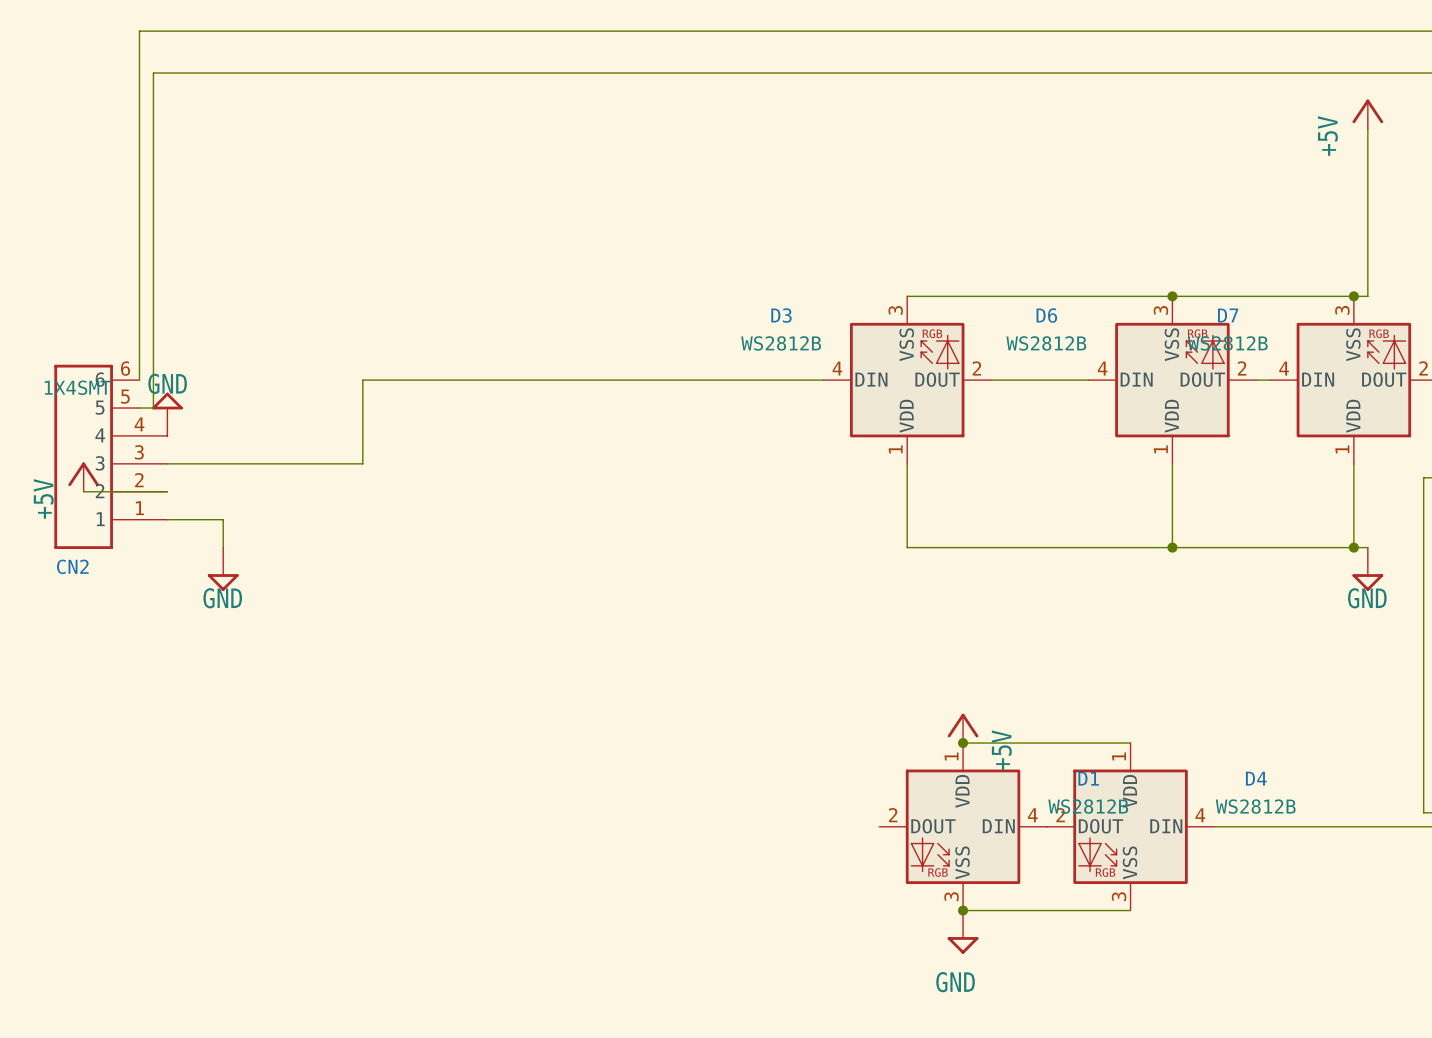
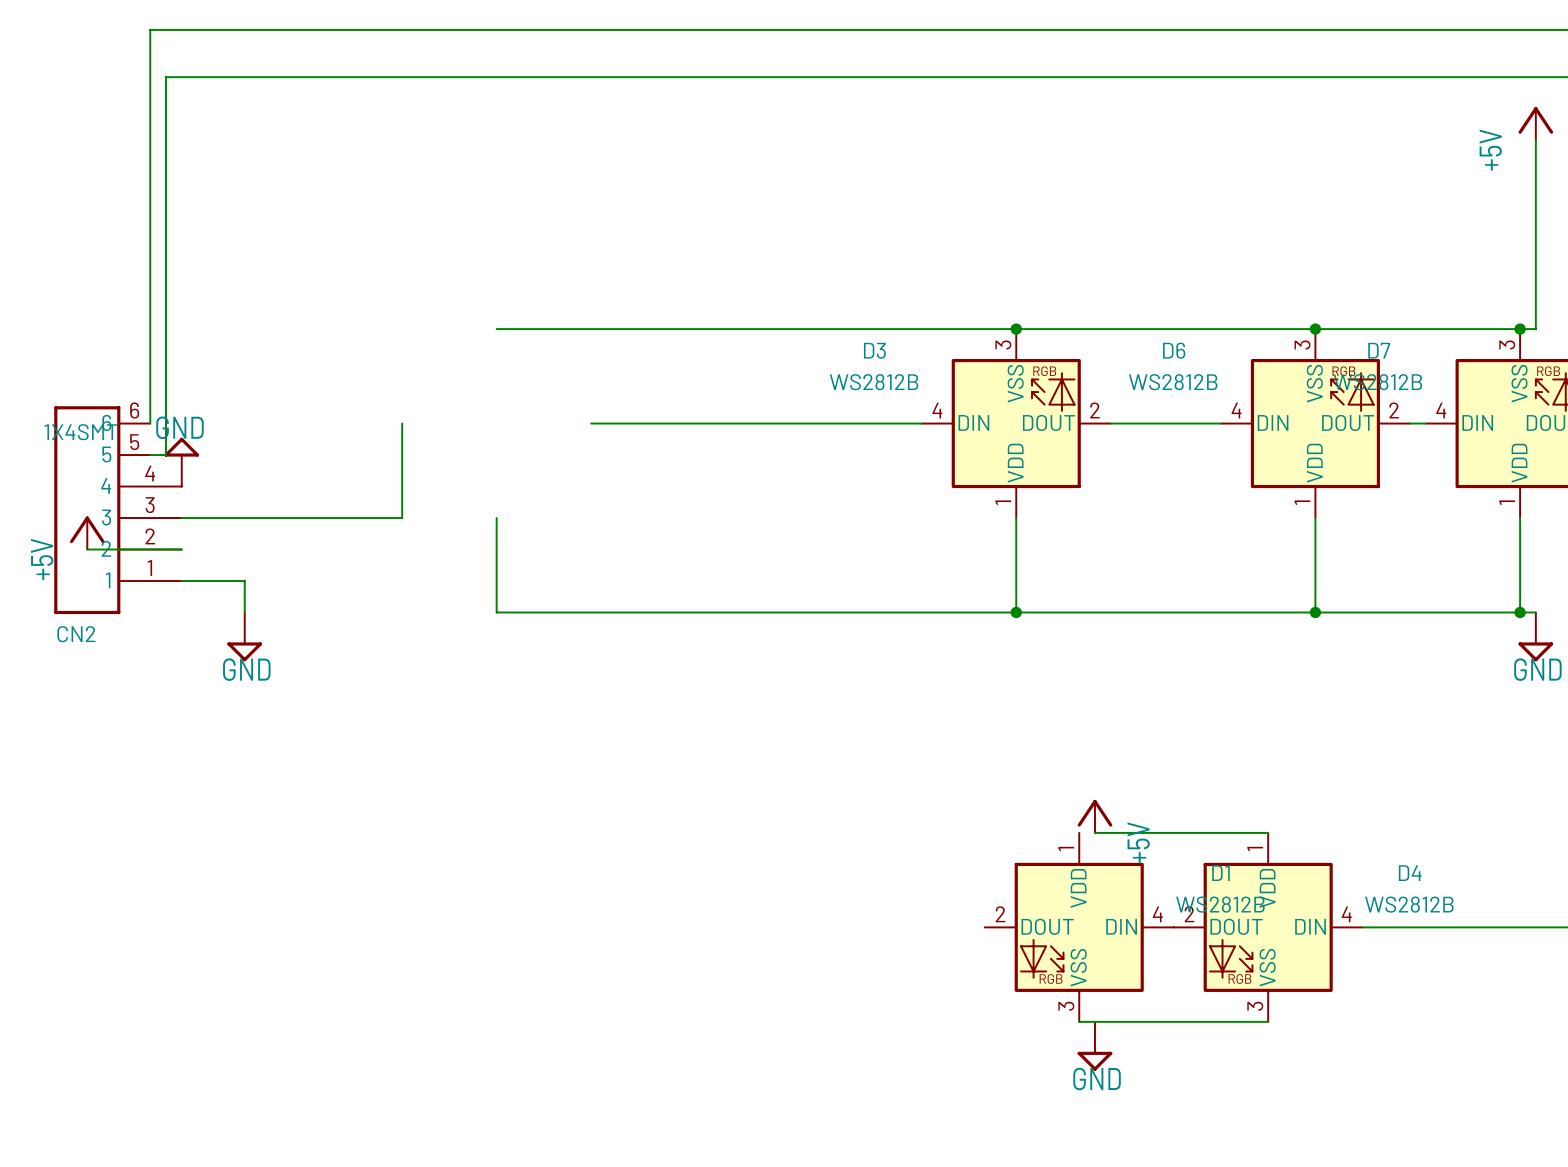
wire: none -> (496, 329) (1016, 329)
junction: none -> (1016, 329)
wire: (362, 380) (530, 380) -> none
wire: none -> (496, 518) (496, 612) (1016, 612)
junction: none -> (1016, 612)
power symbol position: +5V (963, 728) -> +5V (1094, 816)
wire: (963, 743) (977, 743) -> none
junction: (963, 743) -> none
junction: (963, 910) -> none
power symbol position: GND (963, 932) -> GND (1094, 1046)
power symbol text position: GND (955, 982) -> GND (1097, 1079)

